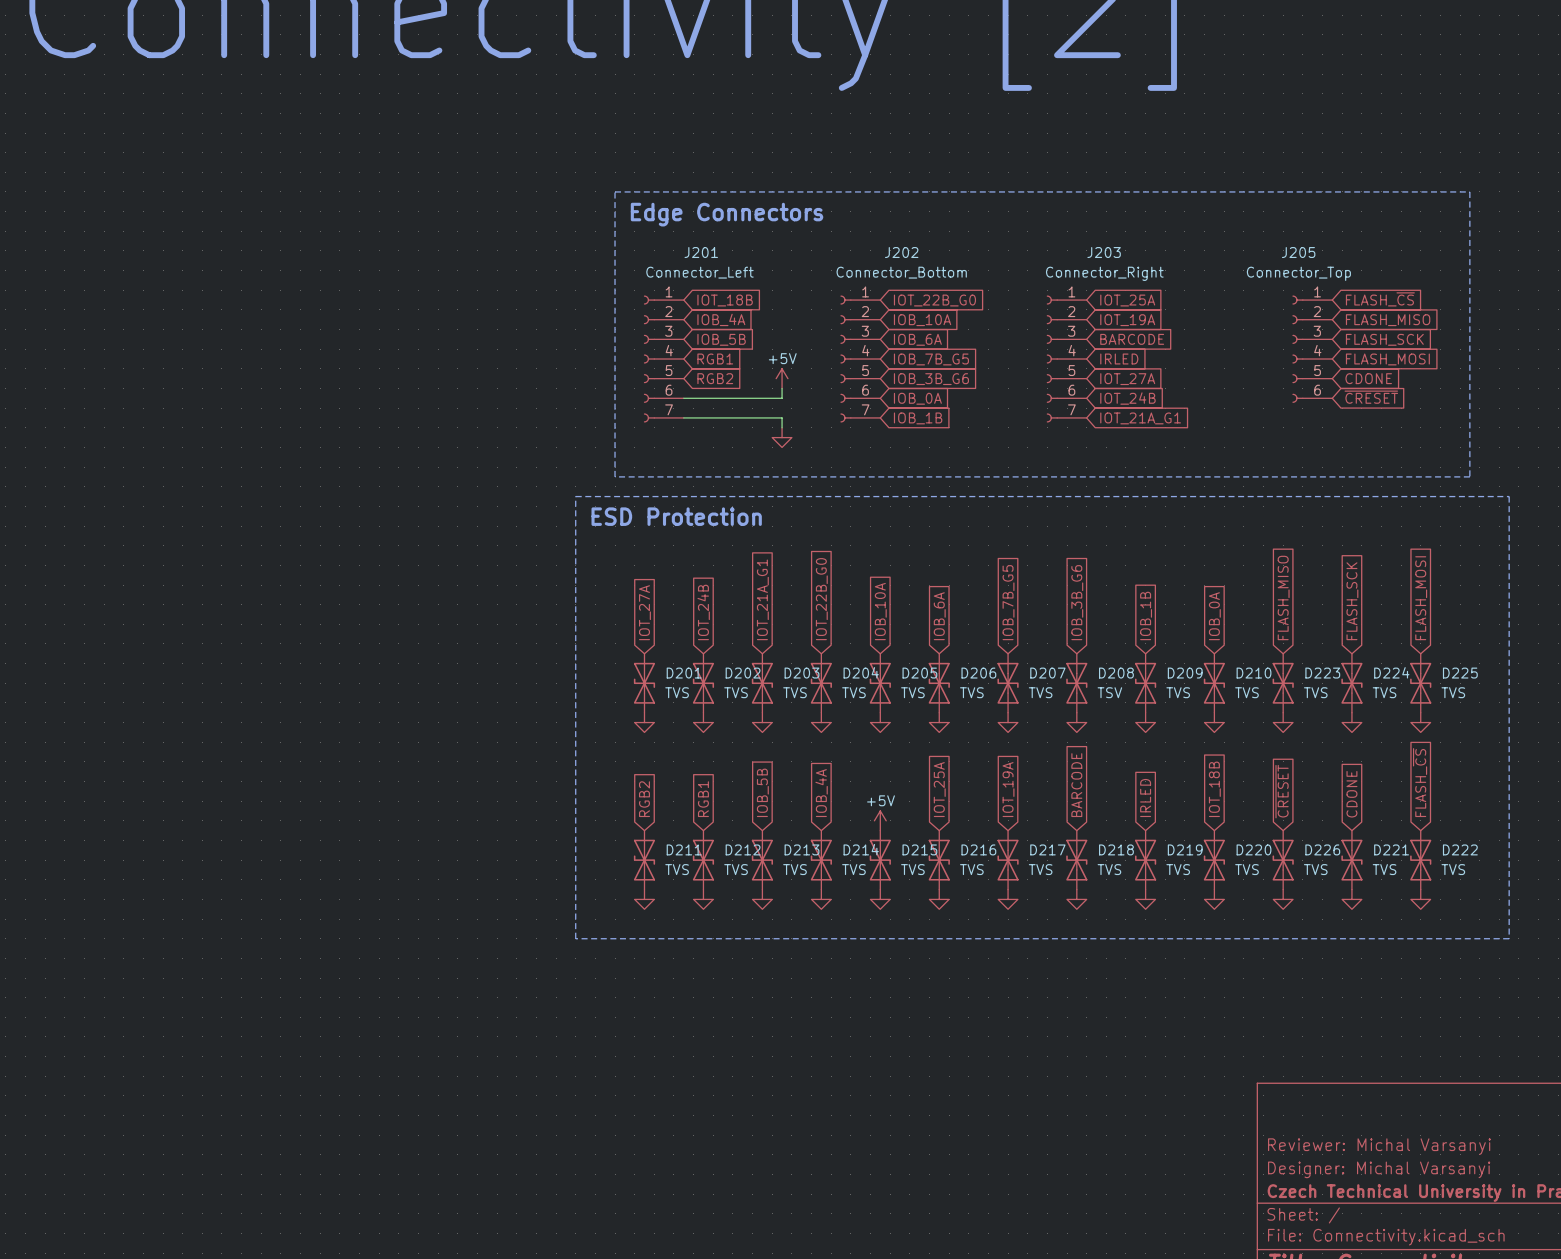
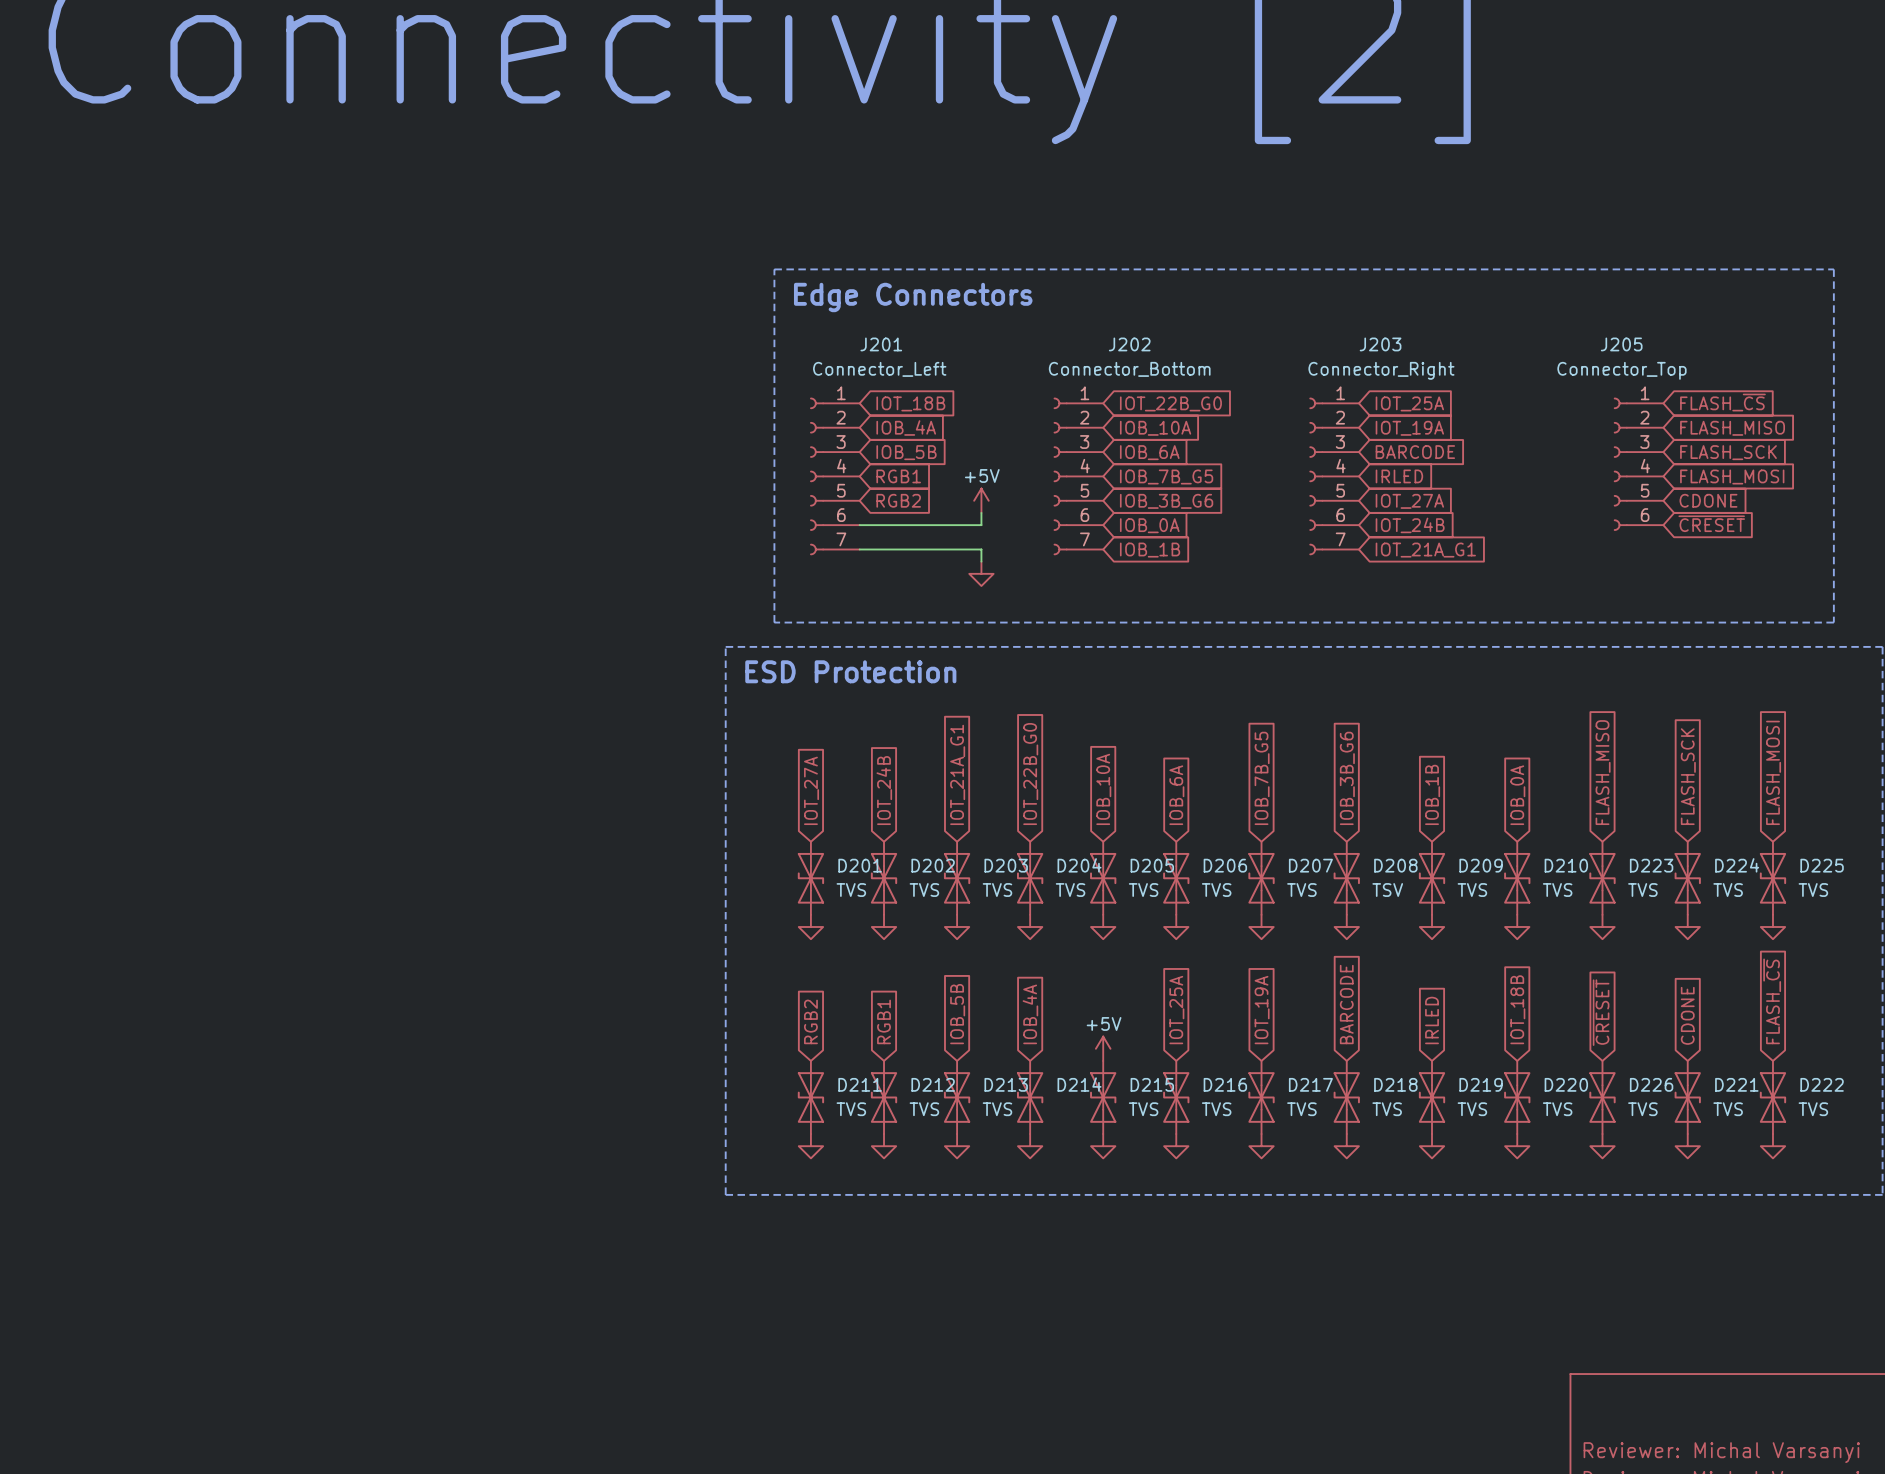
D214 value: TVS (853, 869) -> none

